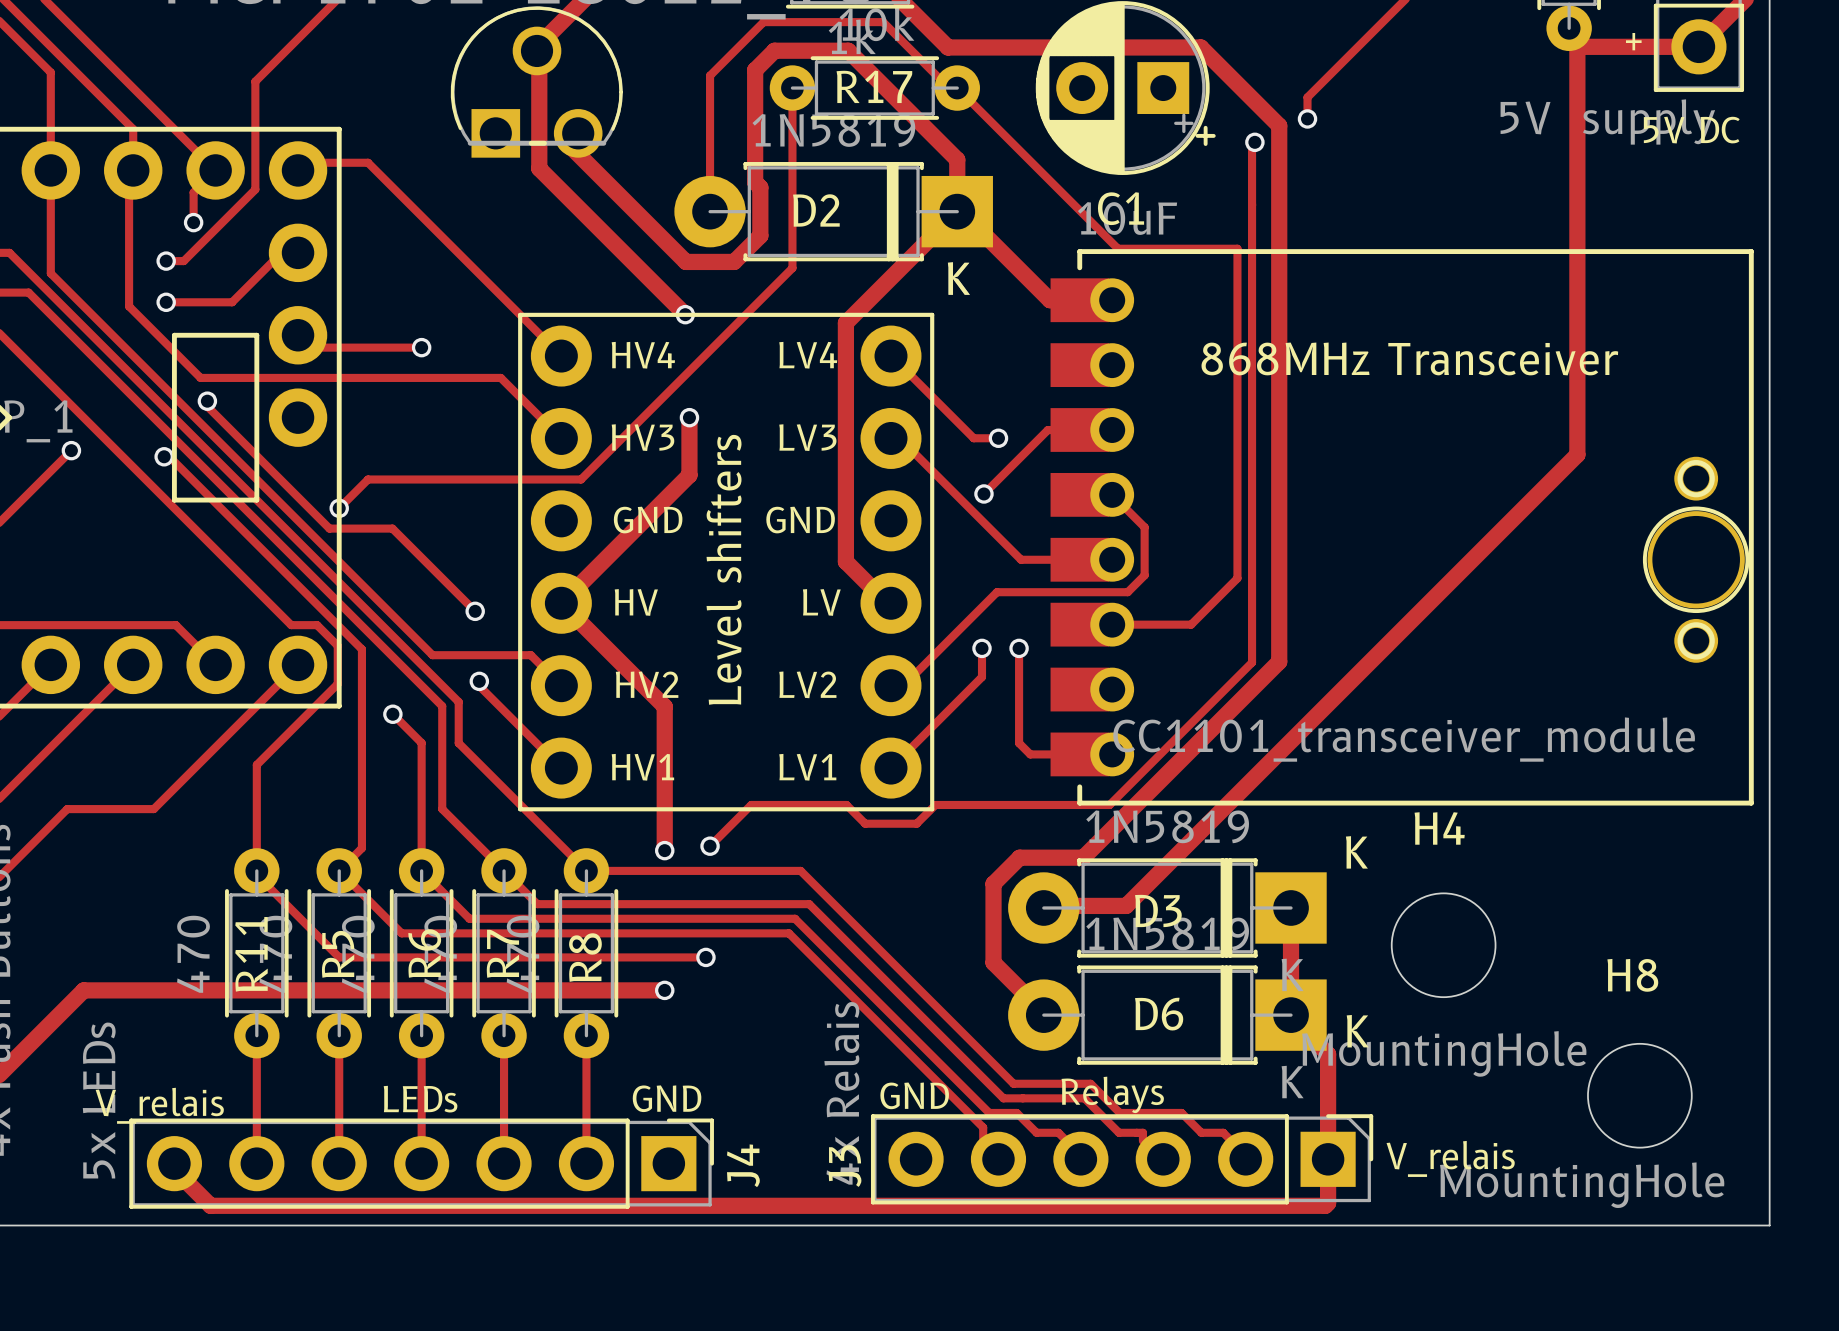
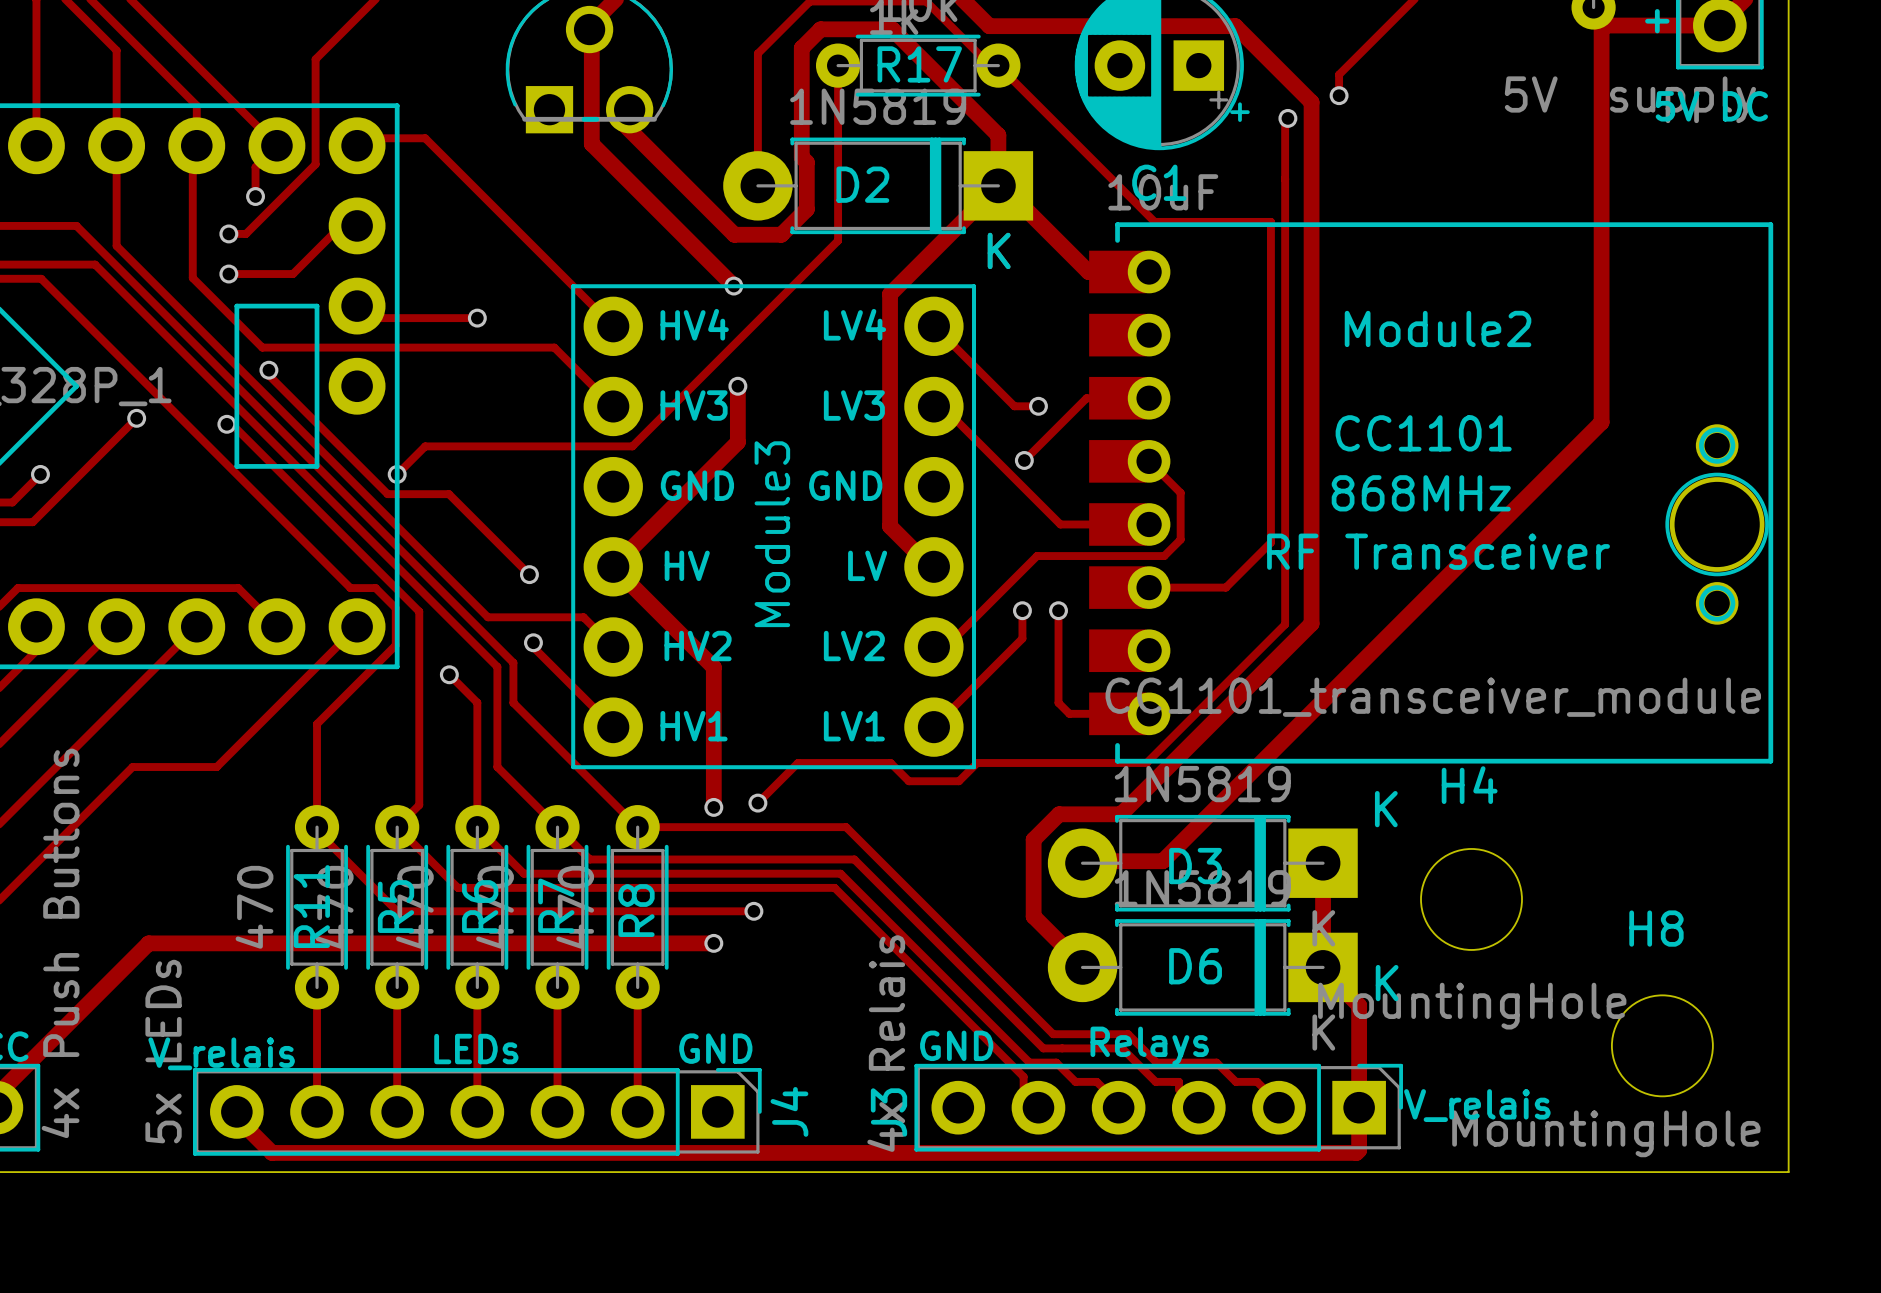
868MHz Transceiver name: 868MHz Transceiver (1409, 358) -> Module2 (1438, 328)
868MHz Transceiver text: none -> CC1101 (1423, 433)
868MHz Transceiver text: none -> 868MHz (1421, 493)
Level shifters name: Level shifters (724, 569) -> Module3 (772, 534)
868MHz Transceiver text: none -> RF Transceiver (1438, 551)

